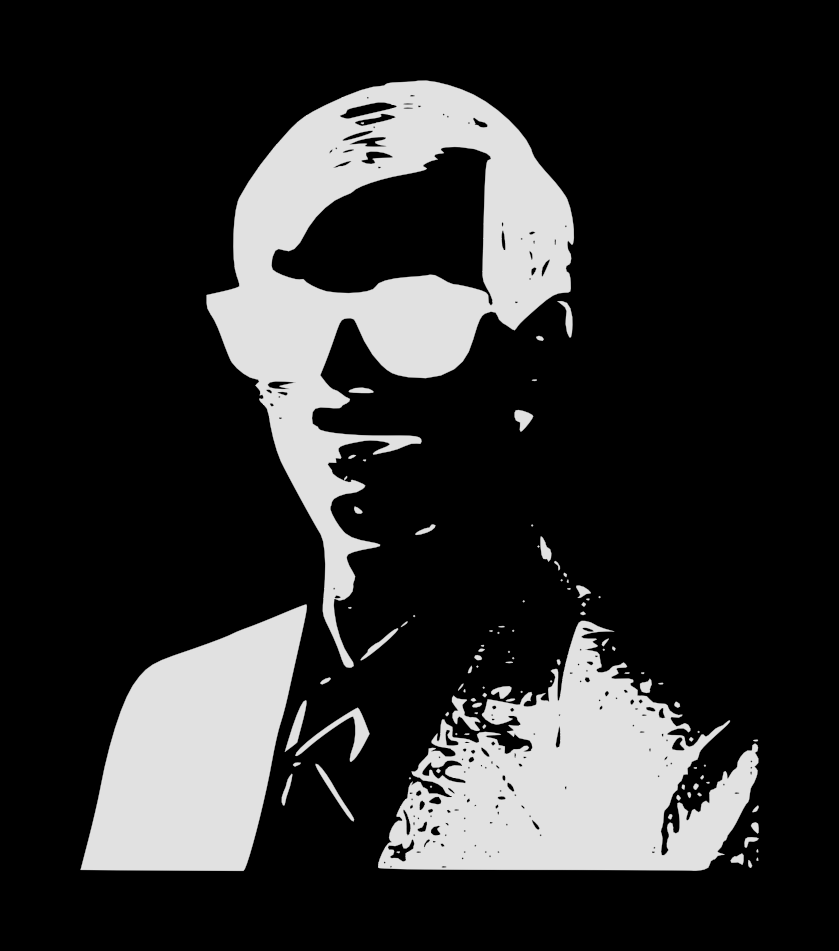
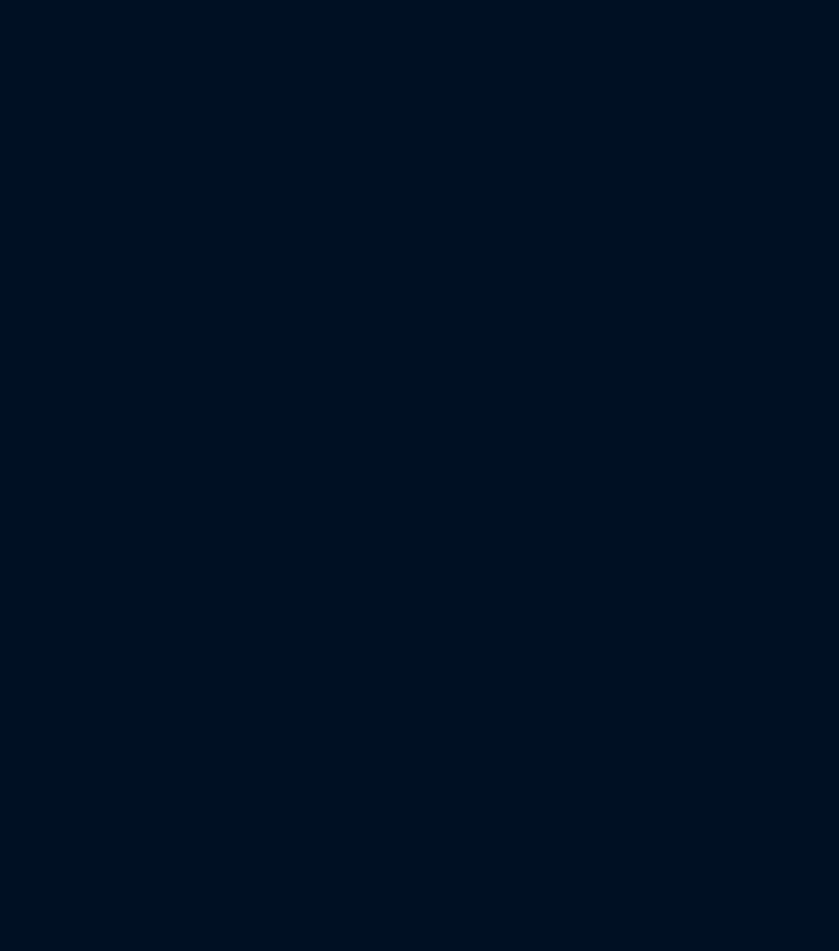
drawing: [80, 80, 759, 872] -> none

